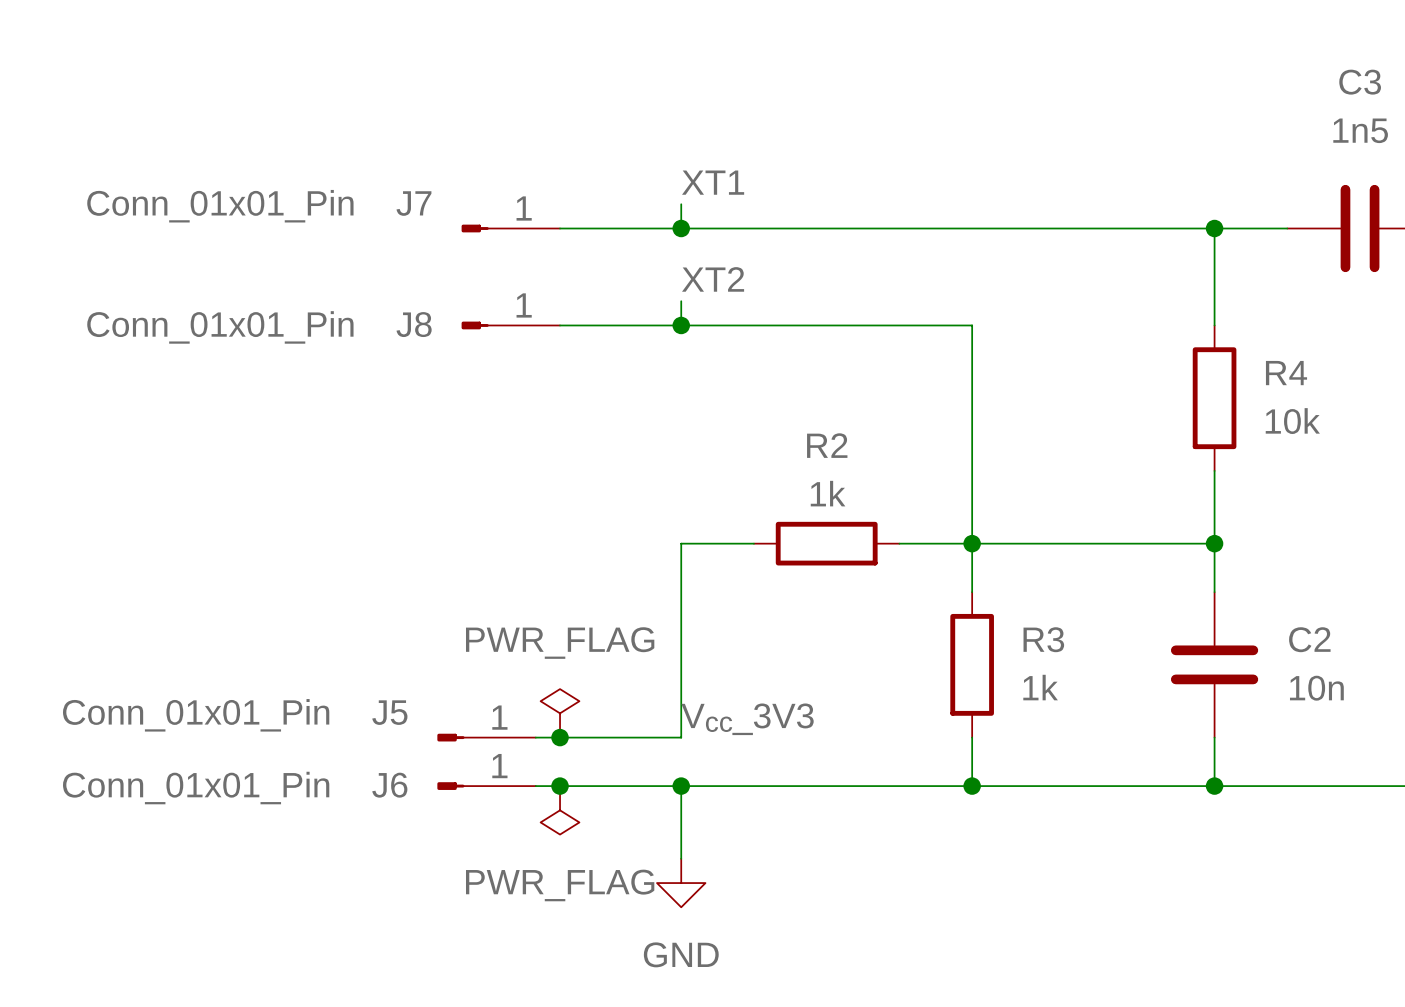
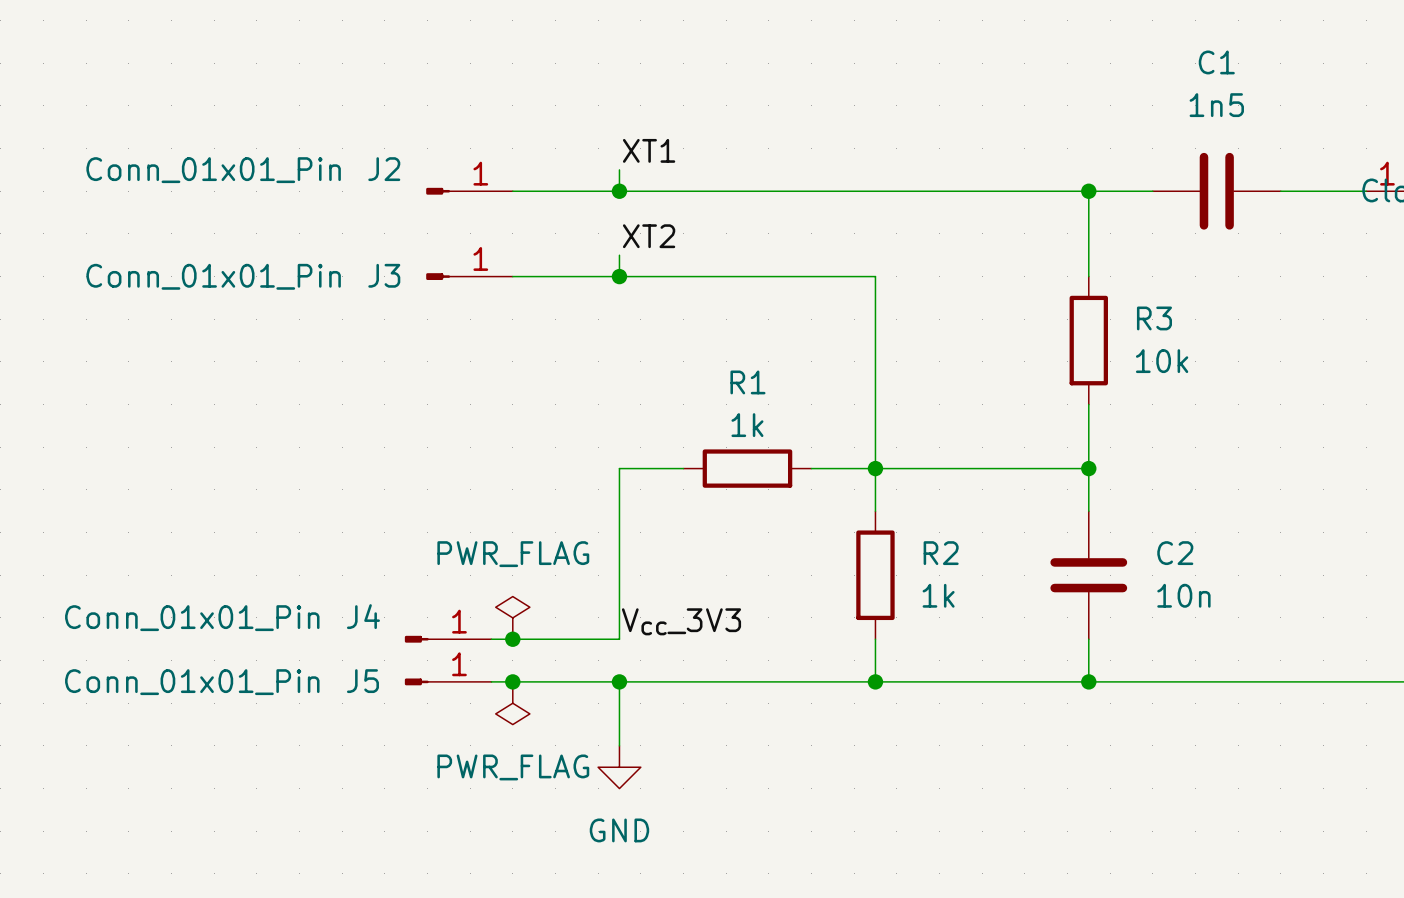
C3 name: C3 (1360, 82) -> C1 (1216, 62)
J7 name: J7 (413, 203) -> J2 (384, 169)
J8 name: J8 (414, 324) -> J3 (384, 275)
R4 name: R4 (1286, 373) -> R3 (1154, 318)
R2 name: R2 (827, 445) -> R1 (747, 382)
R3 name: R3 (1043, 639) -> R2 (941, 553)
J5 name: J5 (389, 712) -> J4 (363, 616)
J6 name: J6 (389, 785) -> J5 (362, 681)

